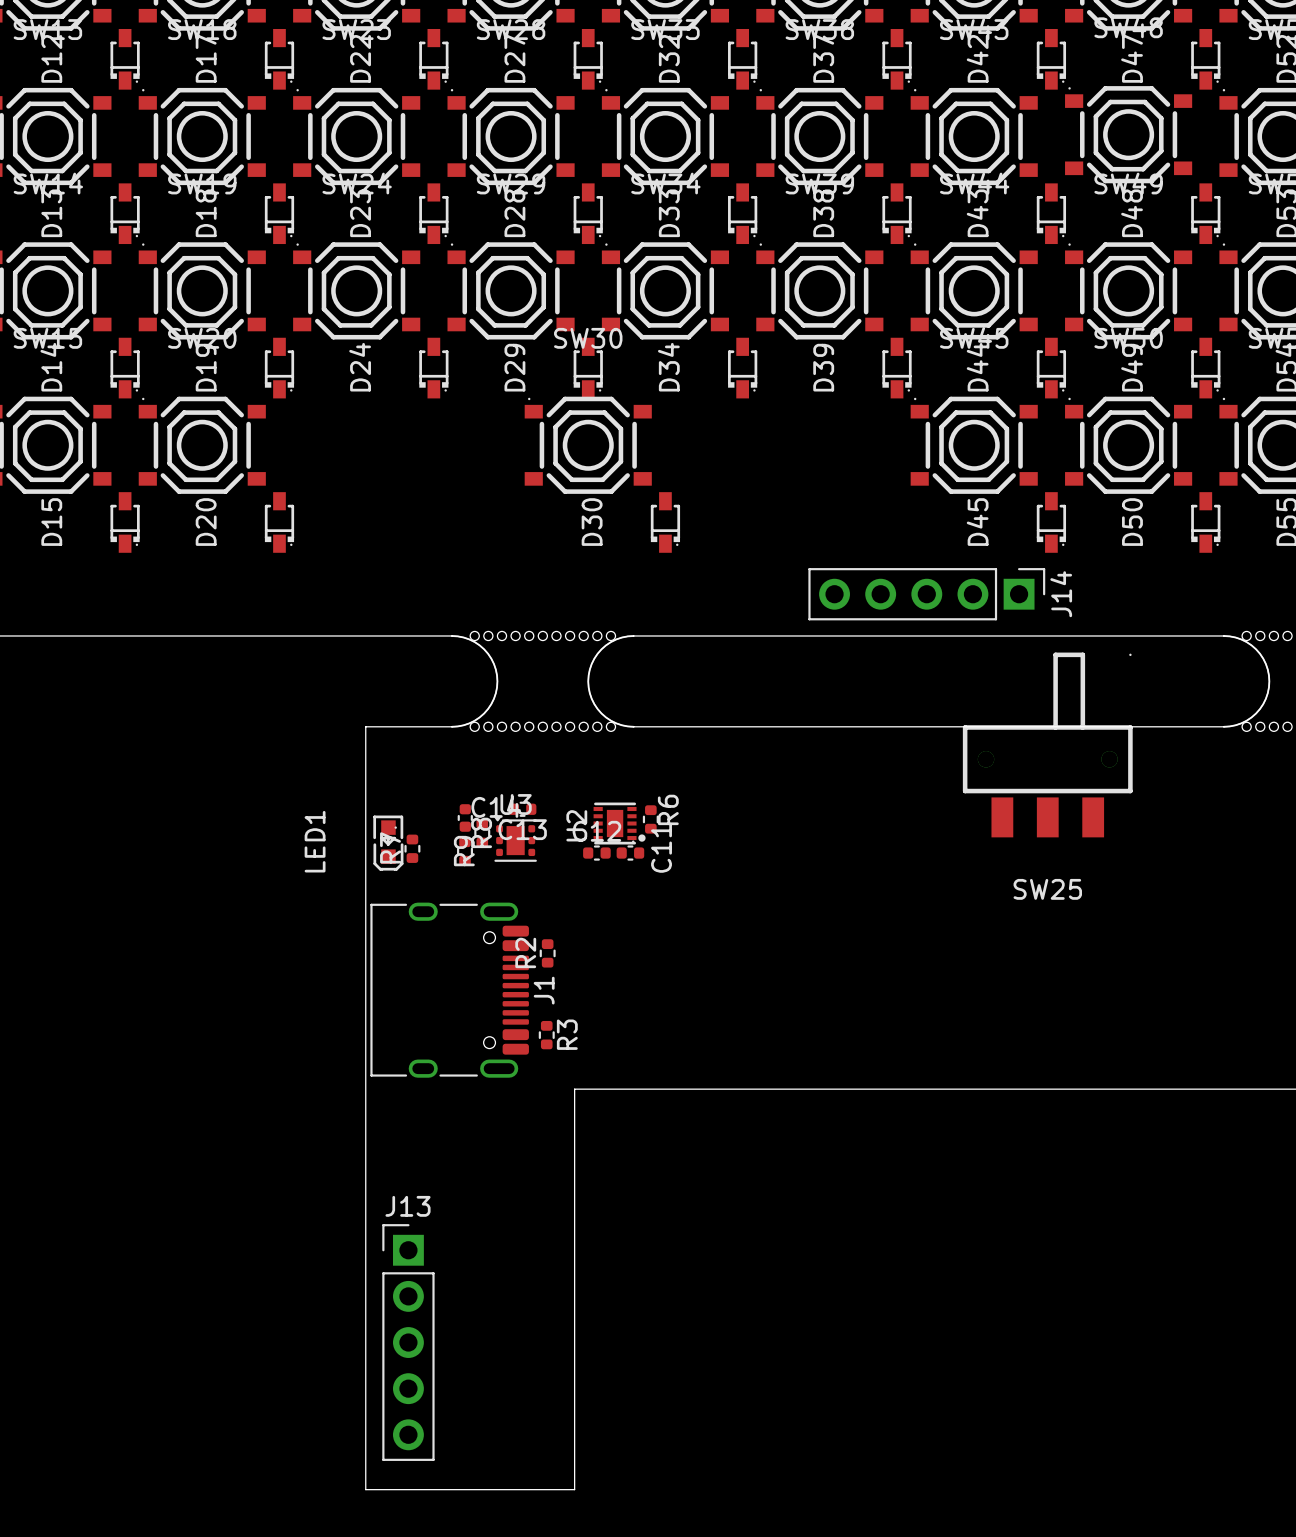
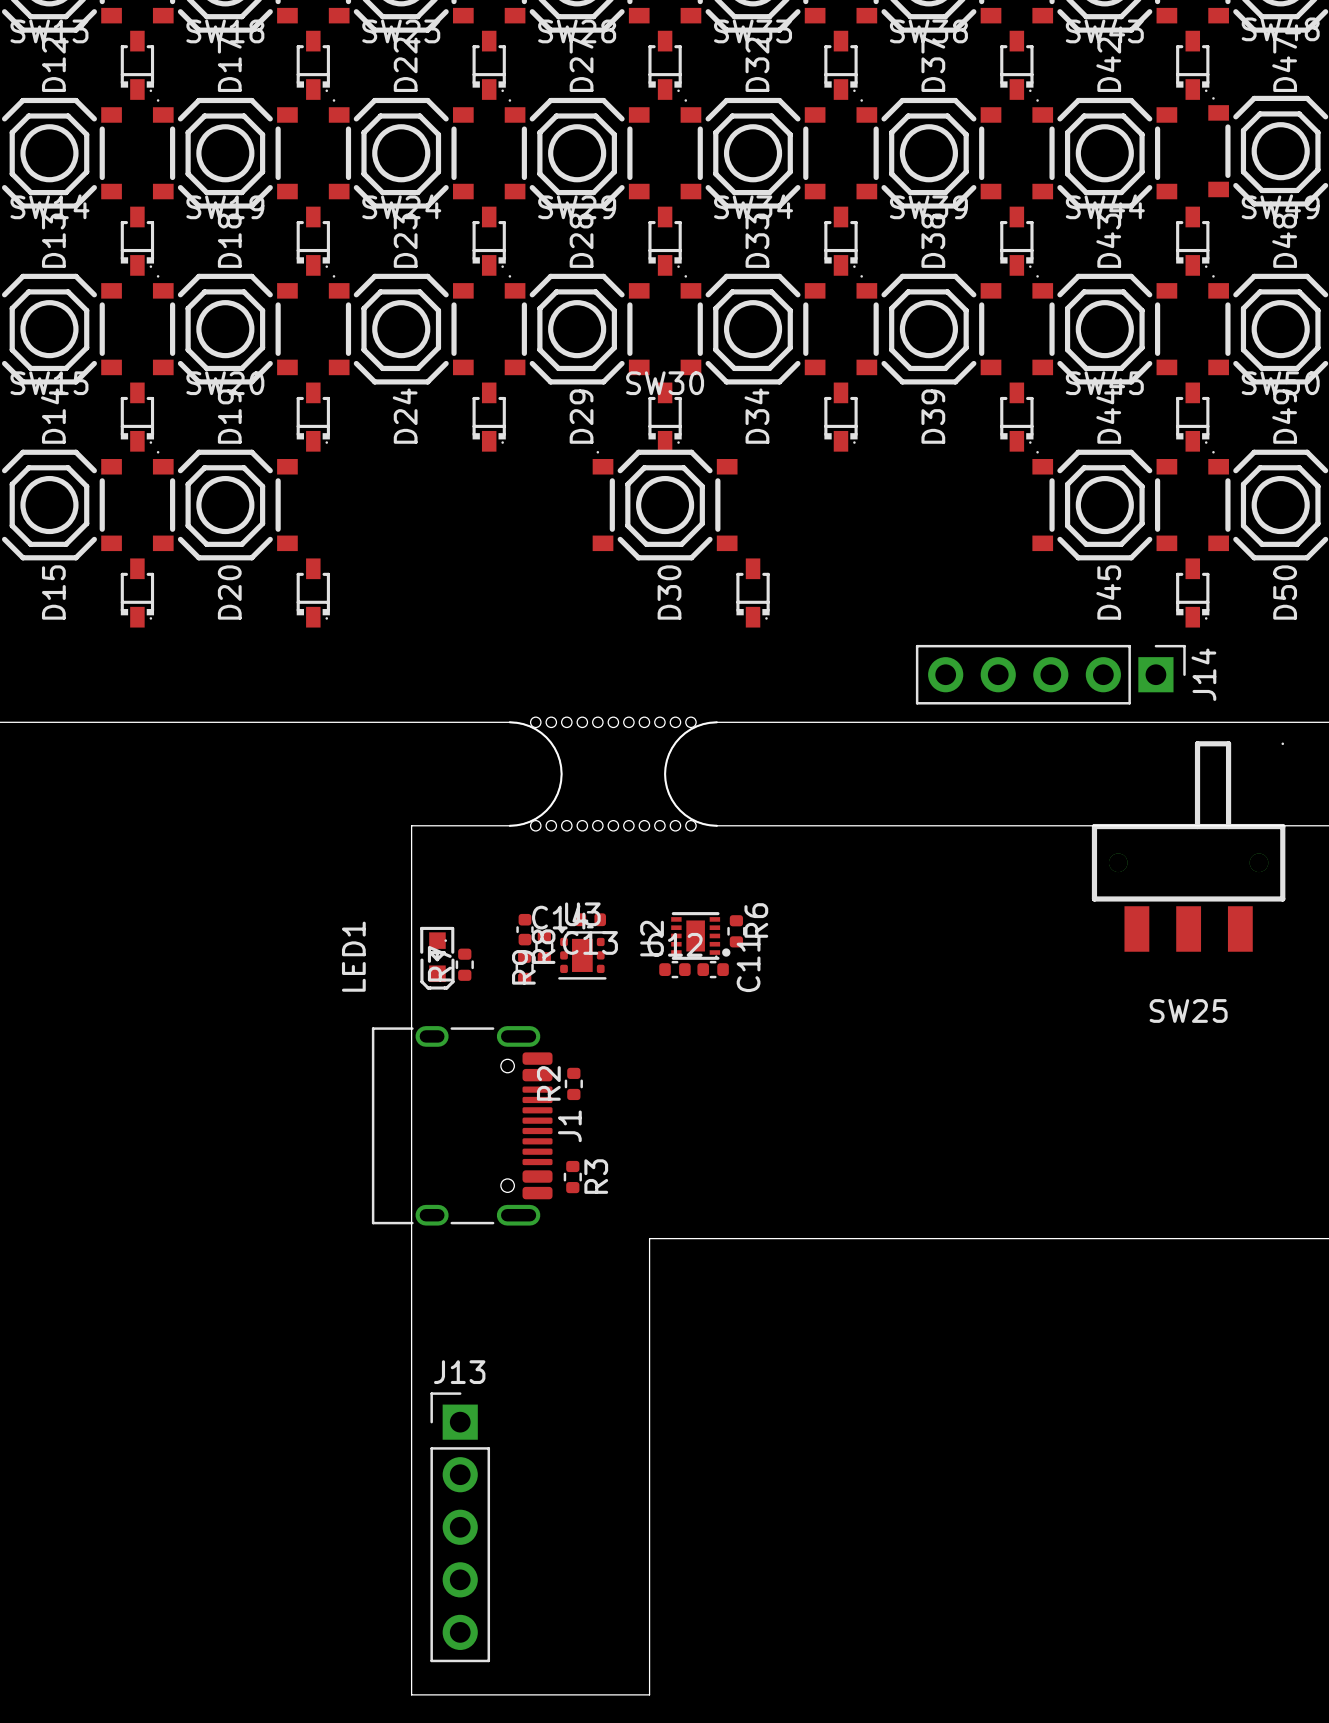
R2 position: (547, 953) -> (573, 1083)
J1 position: (449, 990) -> (462, 1125)
R3 position: (546, 1035) -> (572, 1177)

